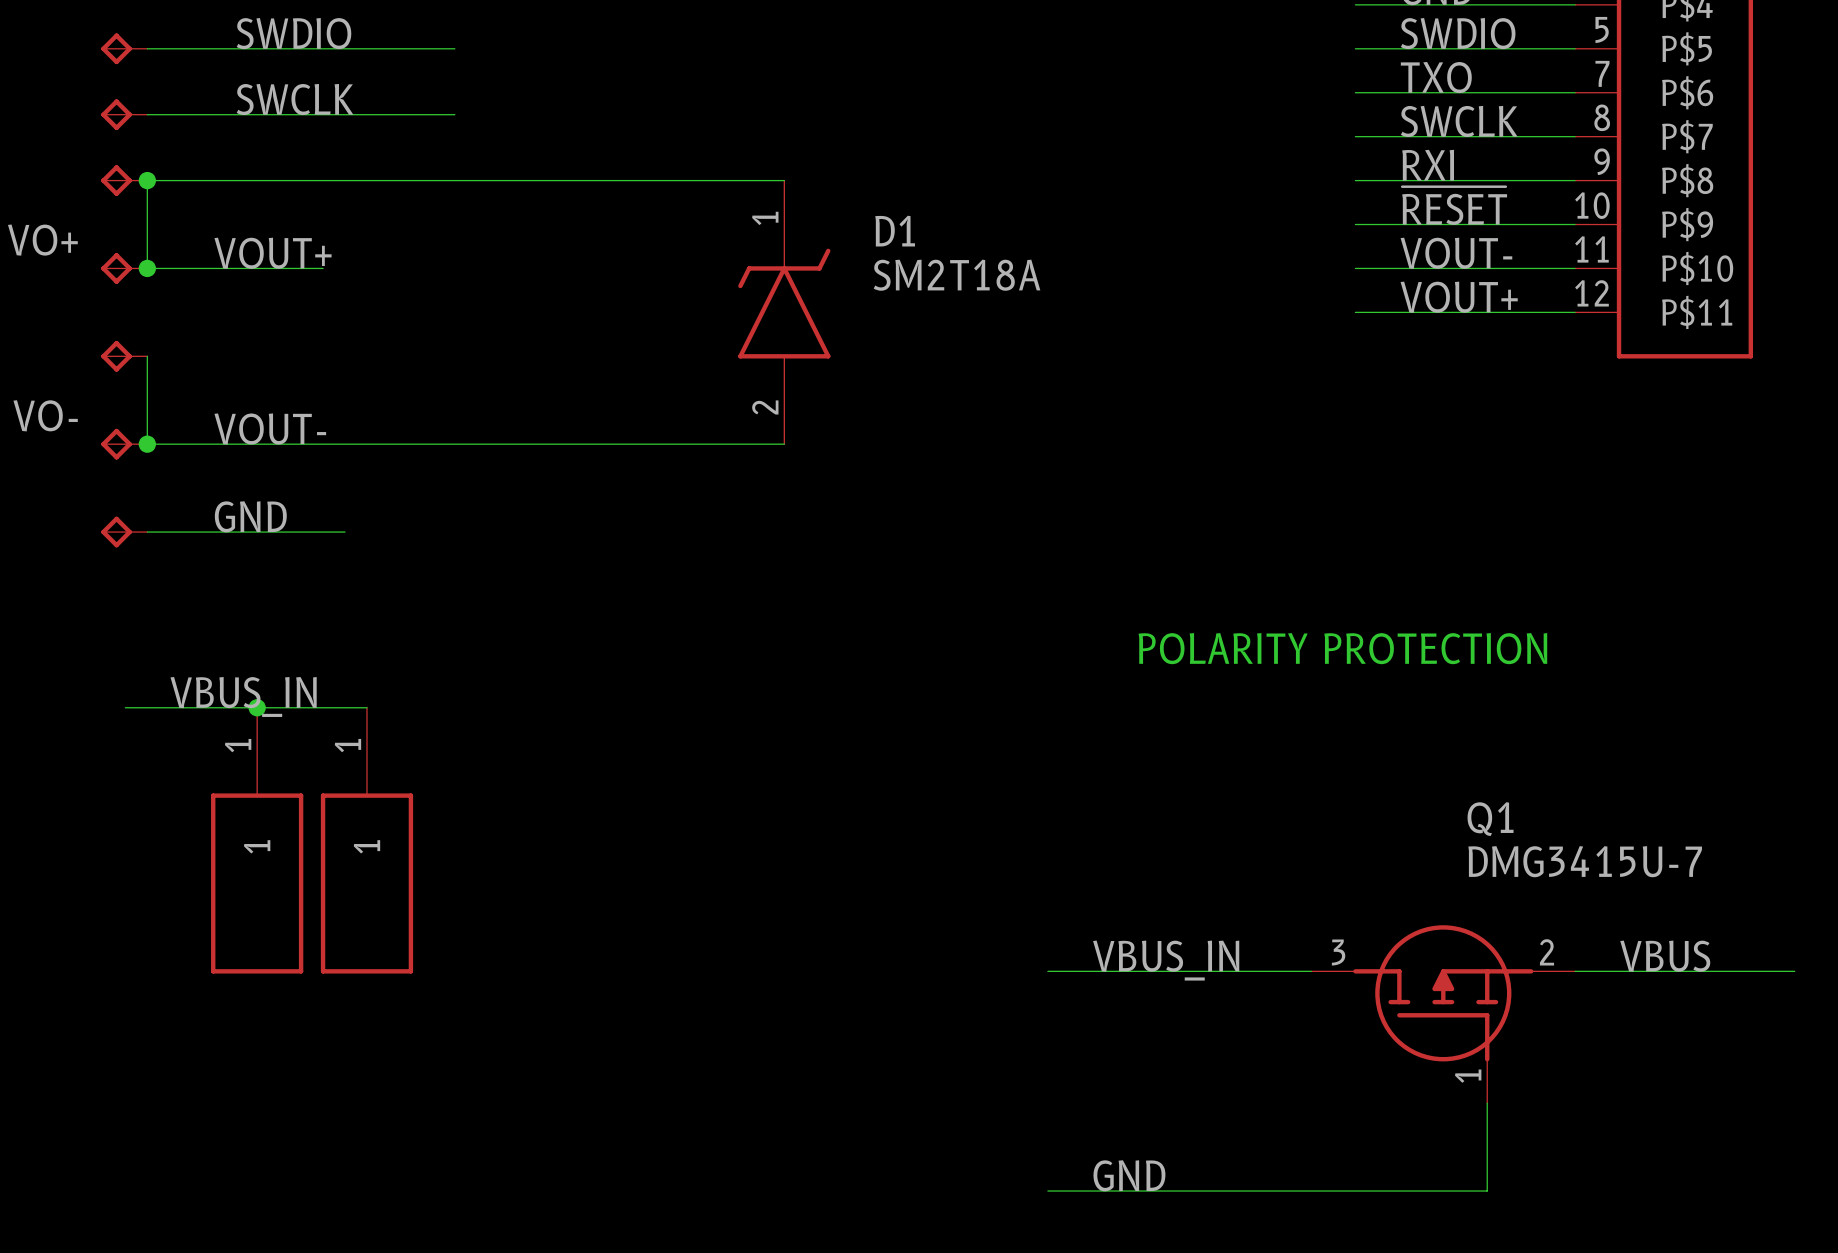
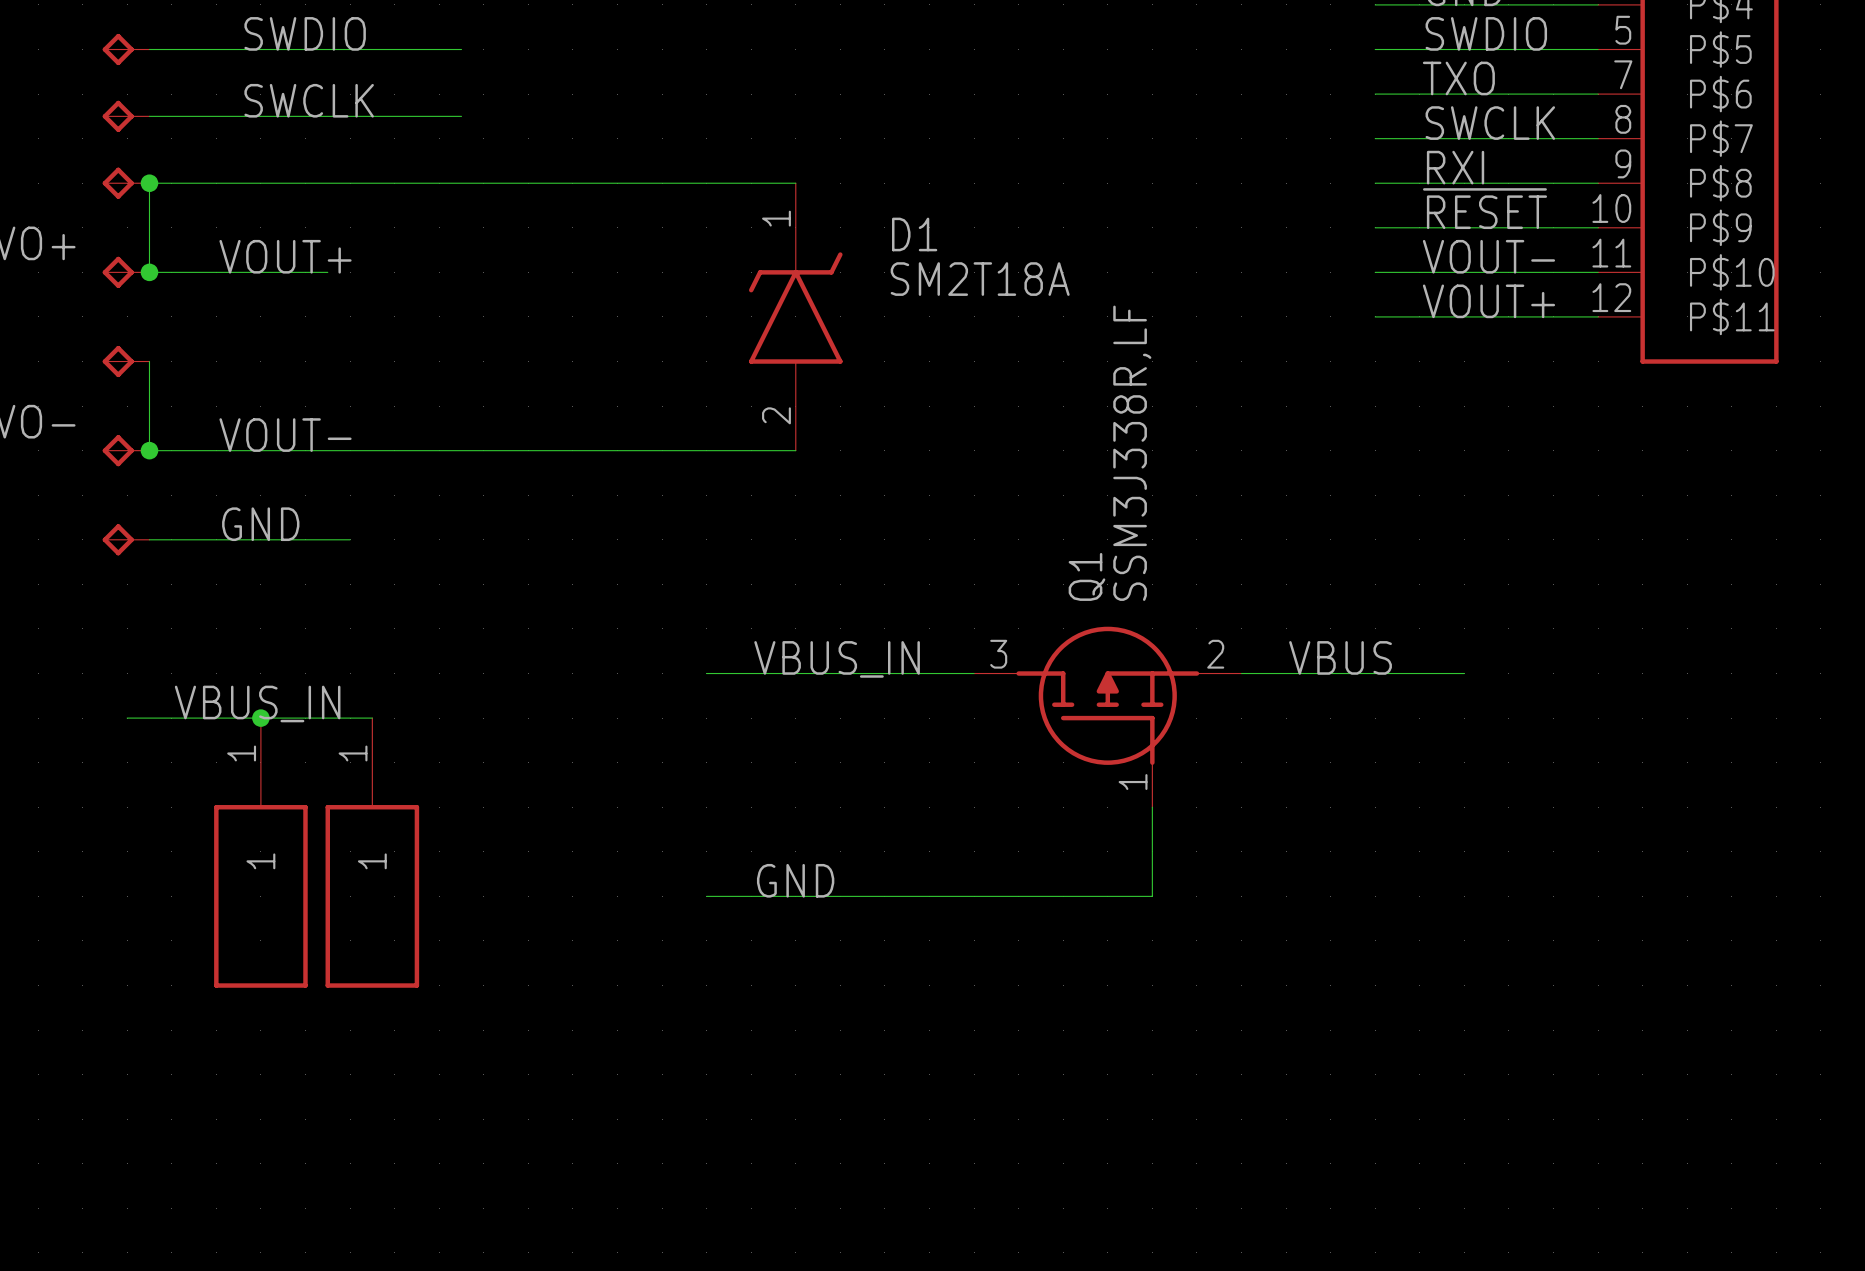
label: none -> VBUS (1340, 657)
text: POLARITY PROTECTION (1342, 648) -> none
label: none -> VBUS_IN (837, 659)
wire: none -> (706, 673) (974, 673)
wire: none -> (1241, 673) (1464, 673)
wire: none -> (1152, 807) (1152, 896) (706, 896)
Q1 name rotation: 0° (1490, 819) -> 90° counterclockwise (1086, 576)
Q1 name position: Q1 (1490, 819) -> Q1 (1086, 576)
Q1 value: DMG3415U-7 (1585, 861) -> SSM3J338R,LF (1132, 453)
label: none -> GND (795, 880)
label: VBUS (1665, 956) -> none
label: VBUS_IN (1166, 960) -> none
wire: (1047, 971) (1311, 971) -> none
wire: (1575, 971) (1794, 971) -> none
Q1 position: (1443, 1014) -> (1107, 716)
wire: (1487, 1103) (1487, 1191) (1047, 1191) -> none
label: GND (1129, 1175) -> none

